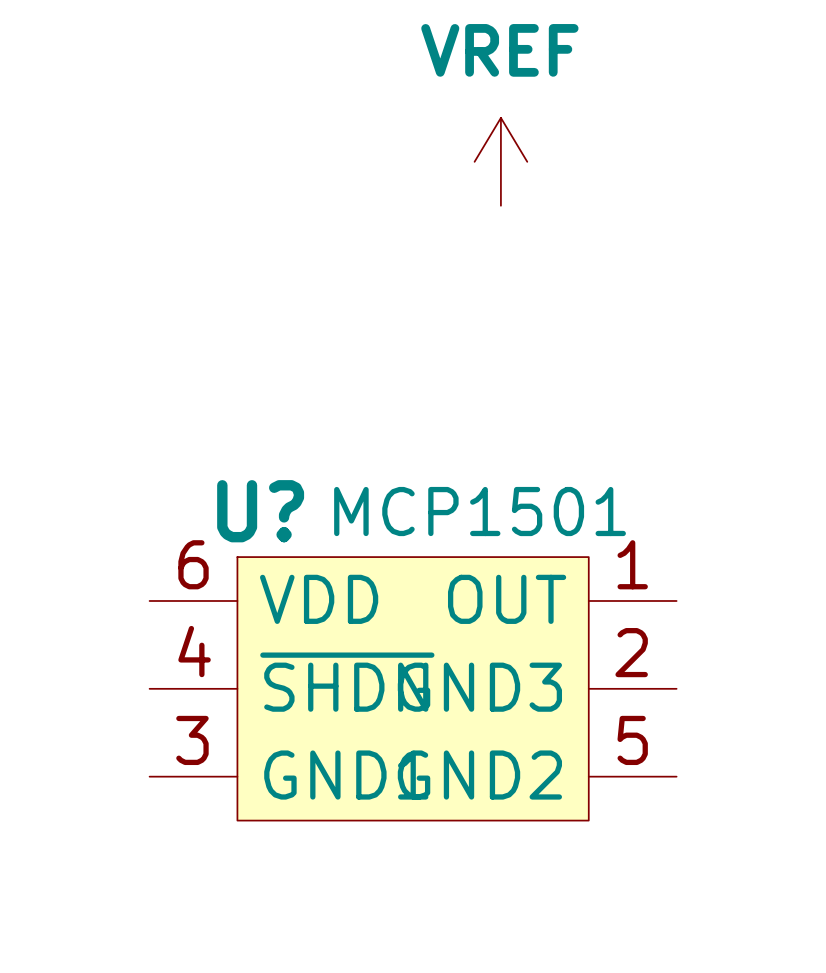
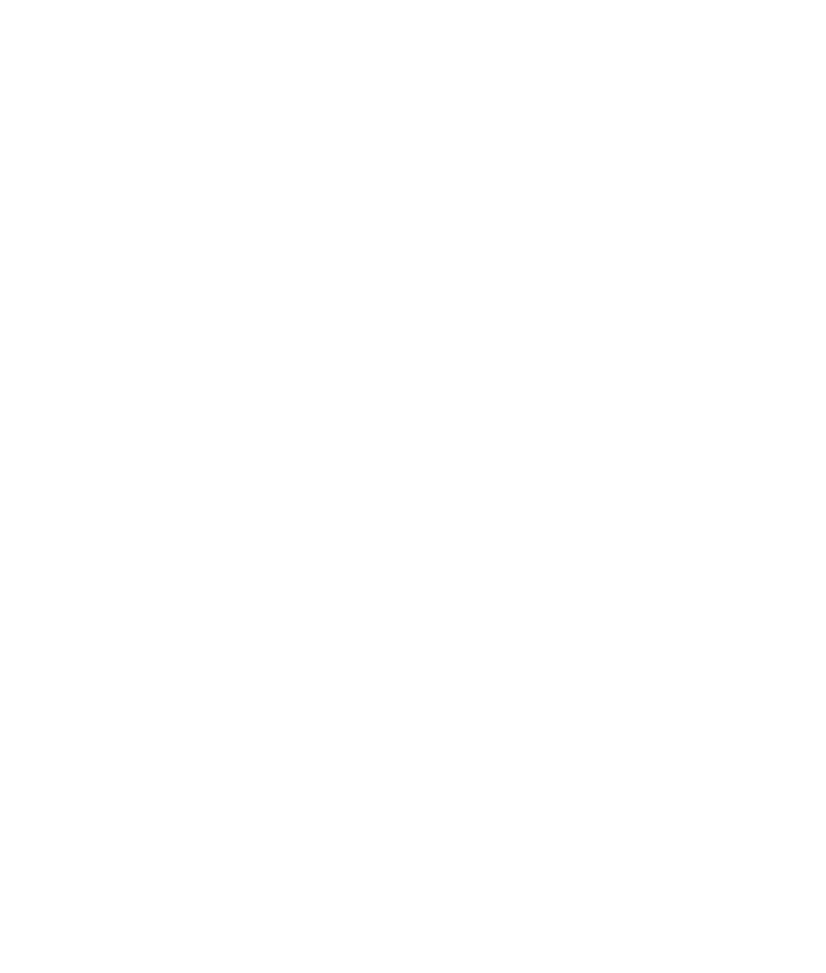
power symbol: VREF (500, 161) -> none
U?: MCP1501 (413, 688) -> none

